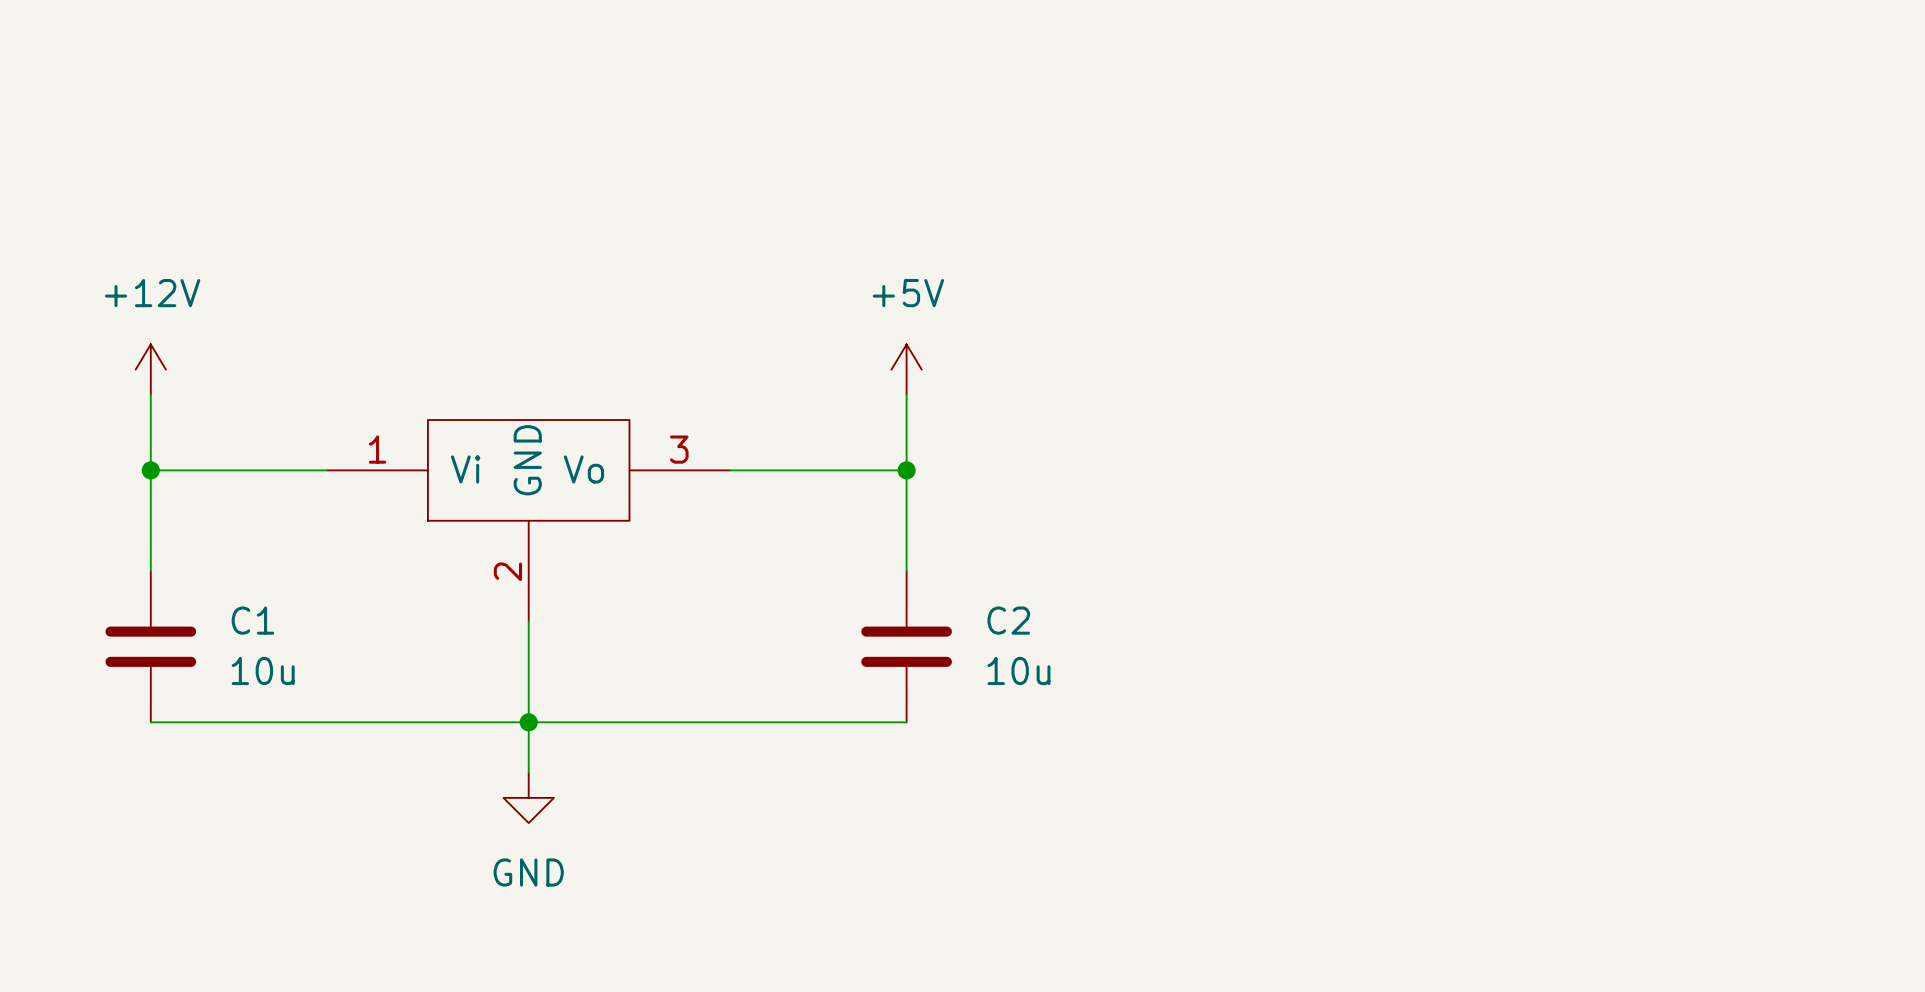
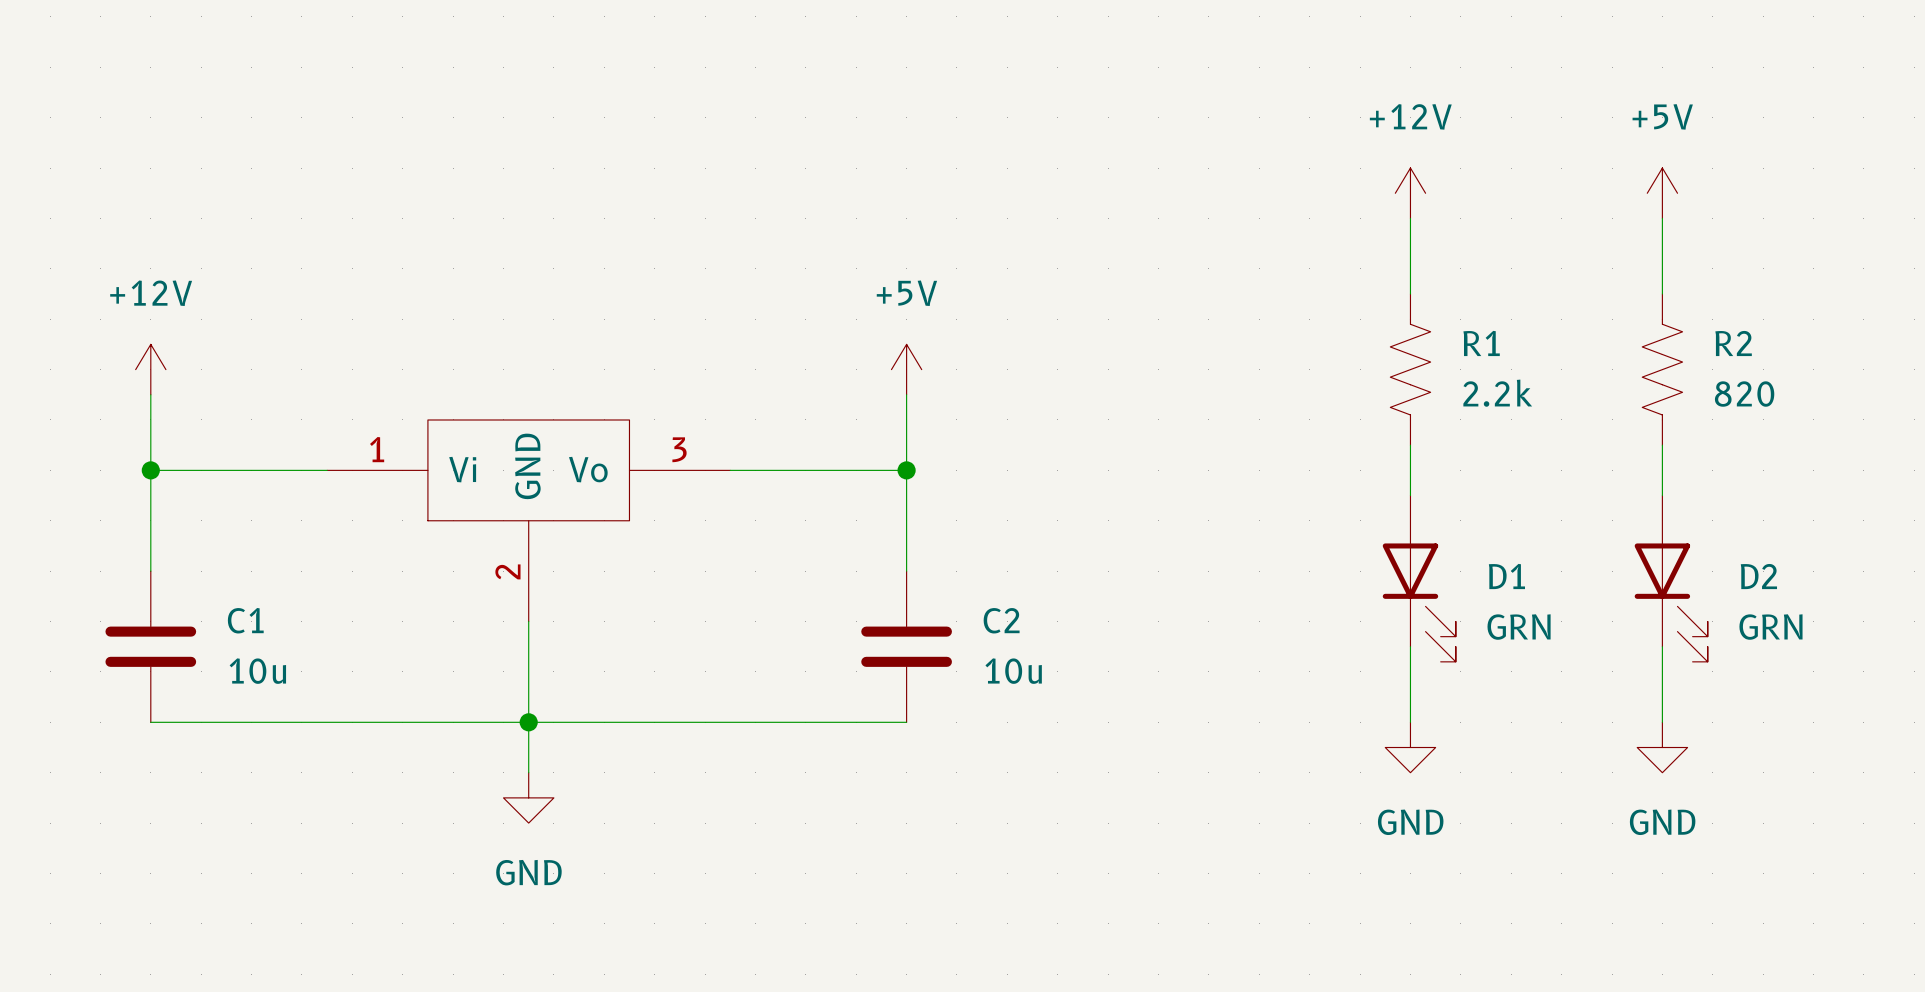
power symbol: none -> +12V (1410, 193)
power symbol: none -> +5V (1662, 193)
wire: none -> (1410, 218) (1410, 294)
wire: none -> (1662, 218) (1662, 294)
R1: none -> 2.2k (1410, 369)
R2: none -> 820 (1662, 369)
wire: none -> (1410, 445) (1410, 495)
wire: none -> (1662, 445) (1662, 495)
D1: none -> GRN (1419, 578)
D2: none -> GRN (1671, 578)
wire: none -> (1410, 646) (1410, 722)
wire: none -> (1662, 646) (1662, 722)
power symbol: none -> GND (1410, 747)
power symbol: none -> GND (1662, 747)

